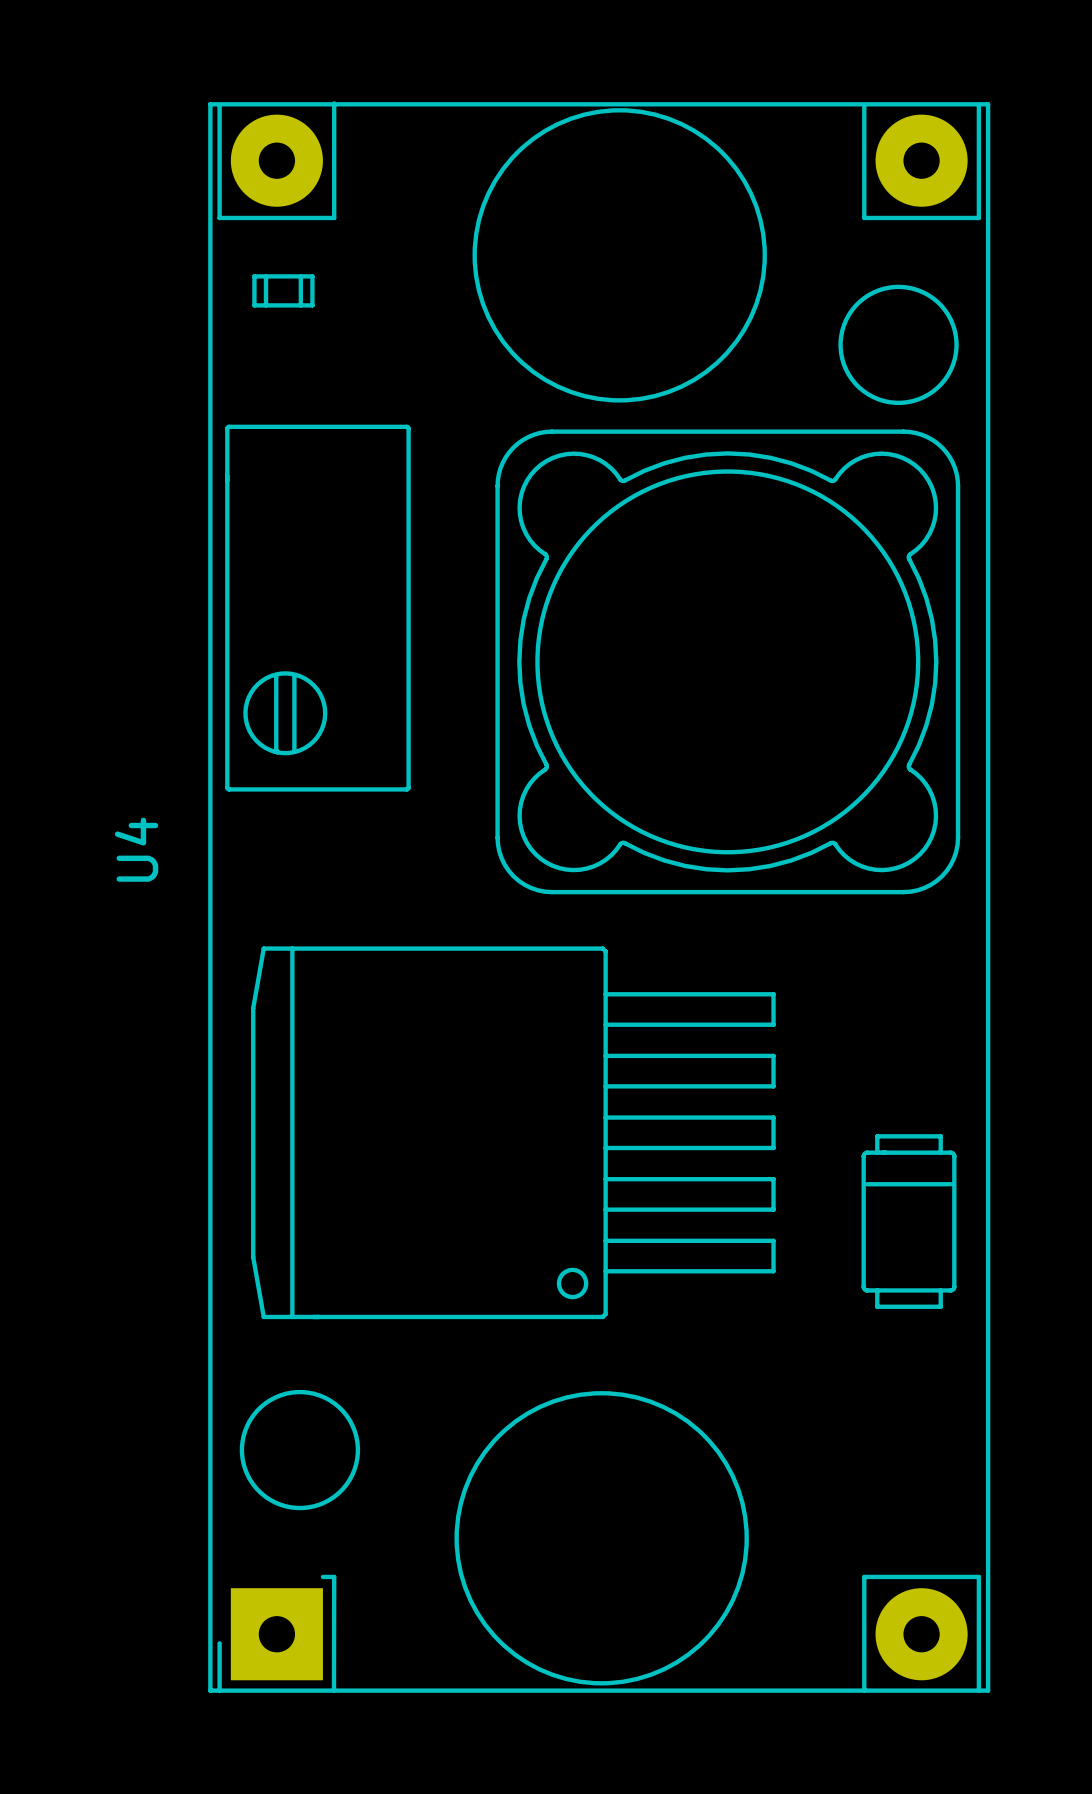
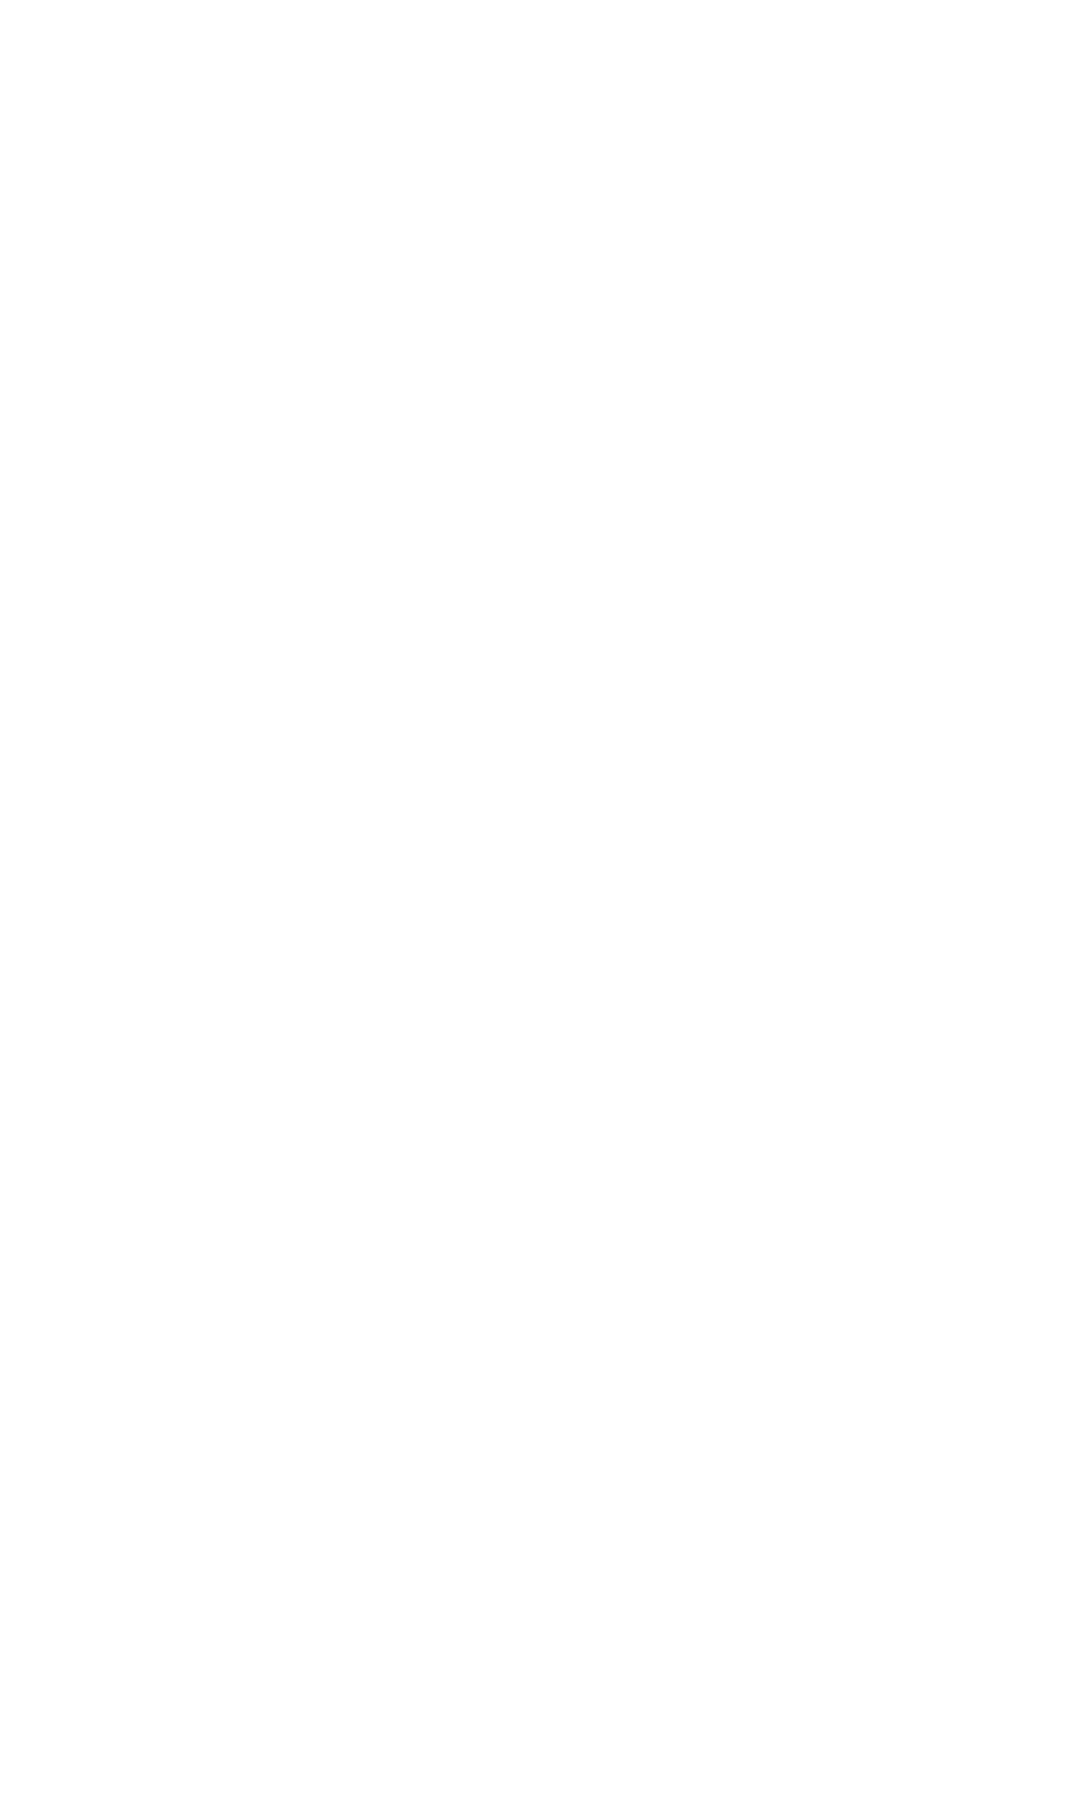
U4: (599, 897) -> none

